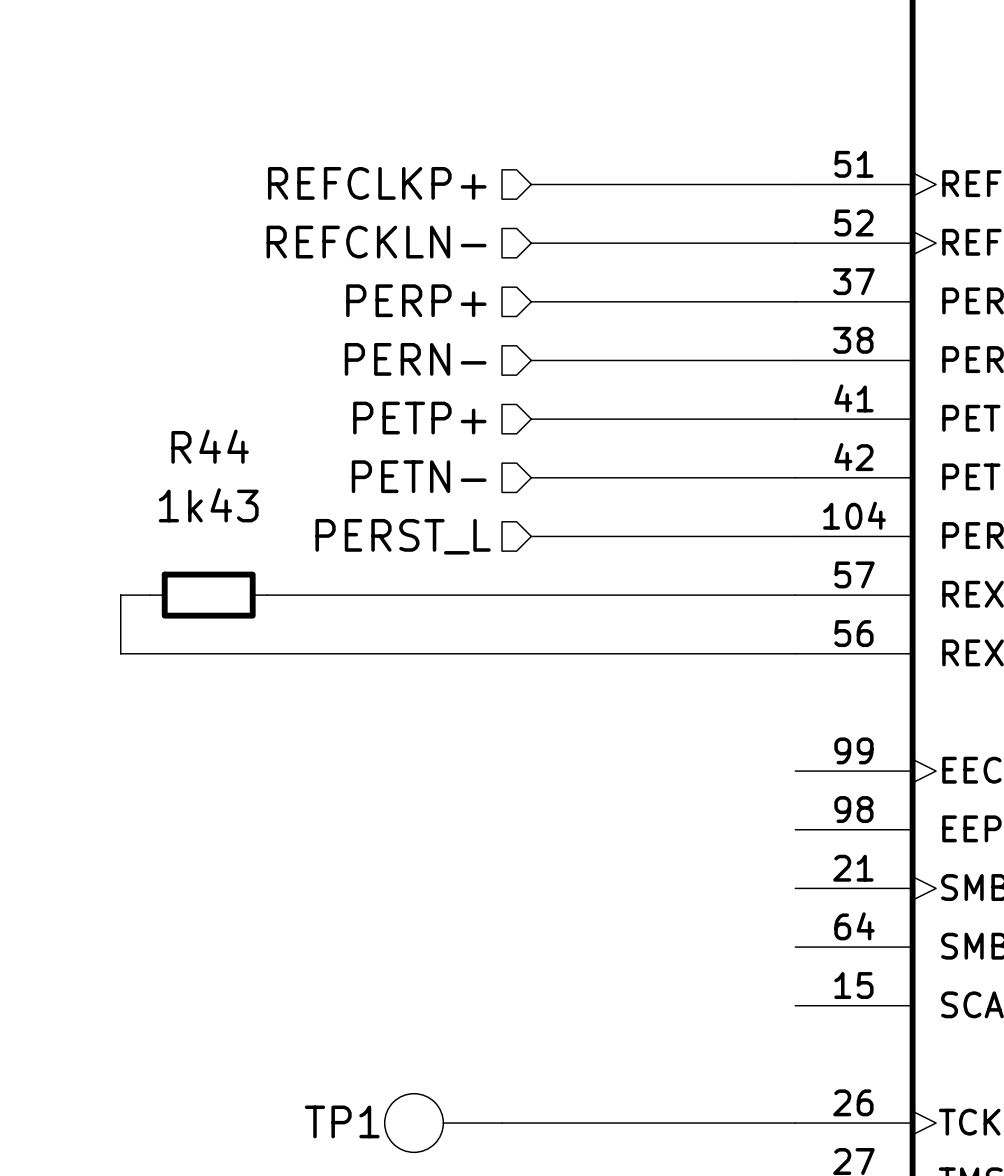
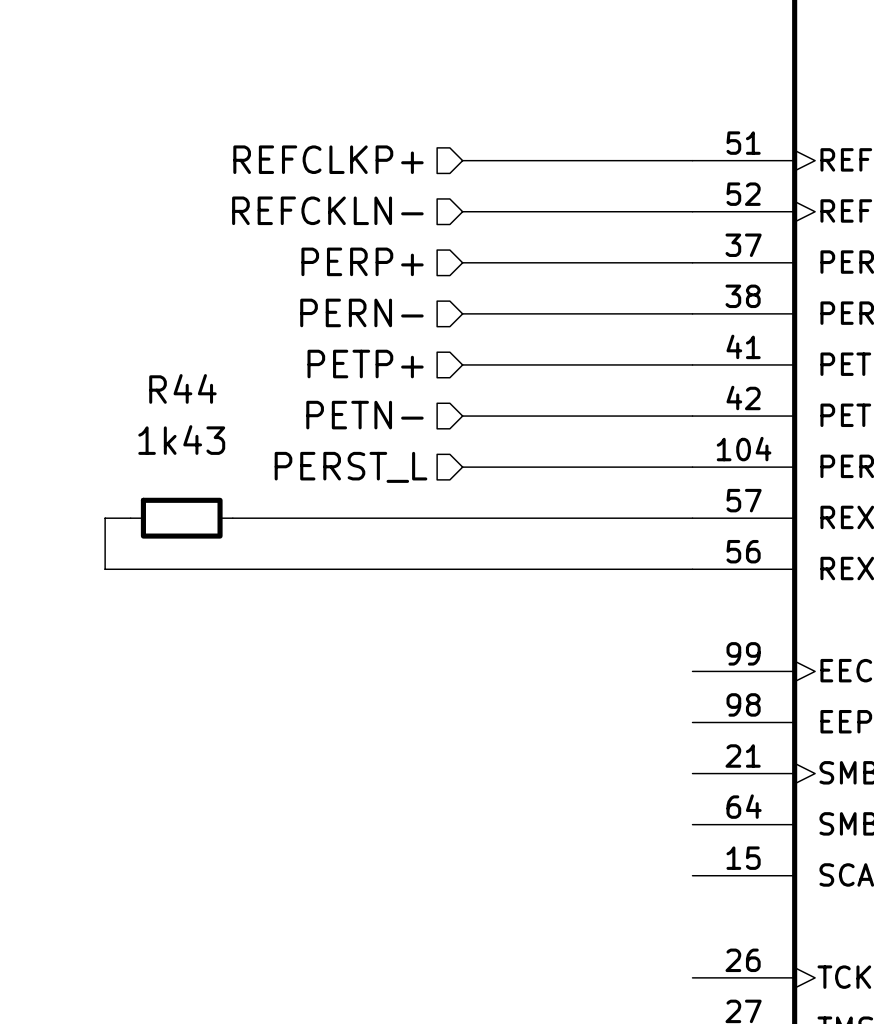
TP1: (443, 1123) -> none
wire: (502, 1123) (795, 1123) -> none

